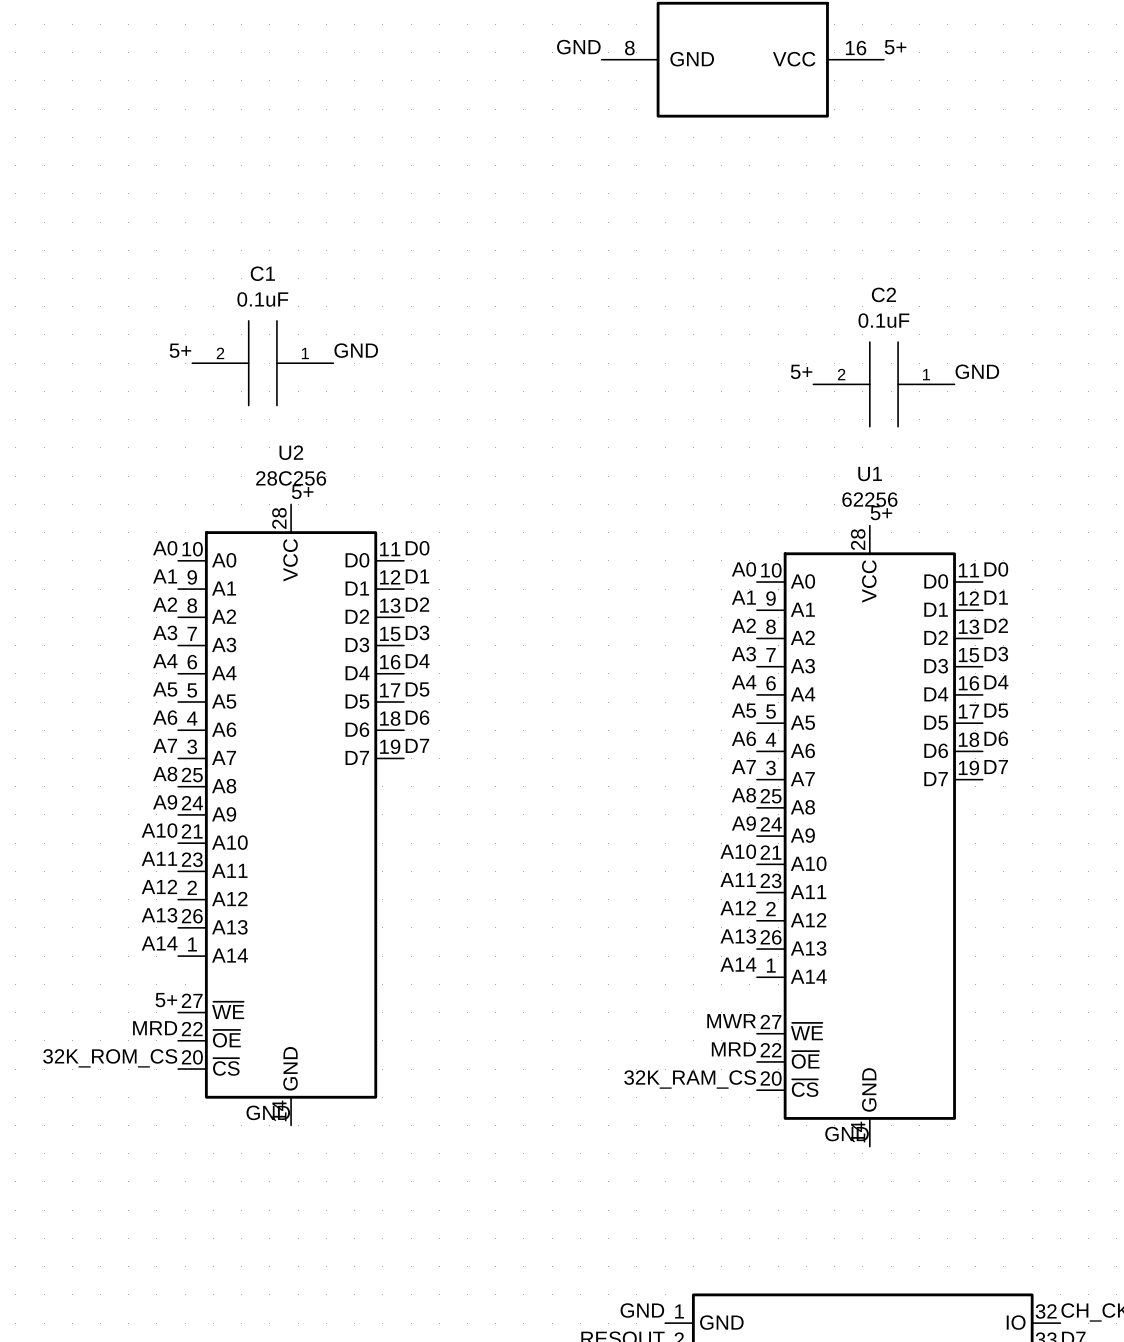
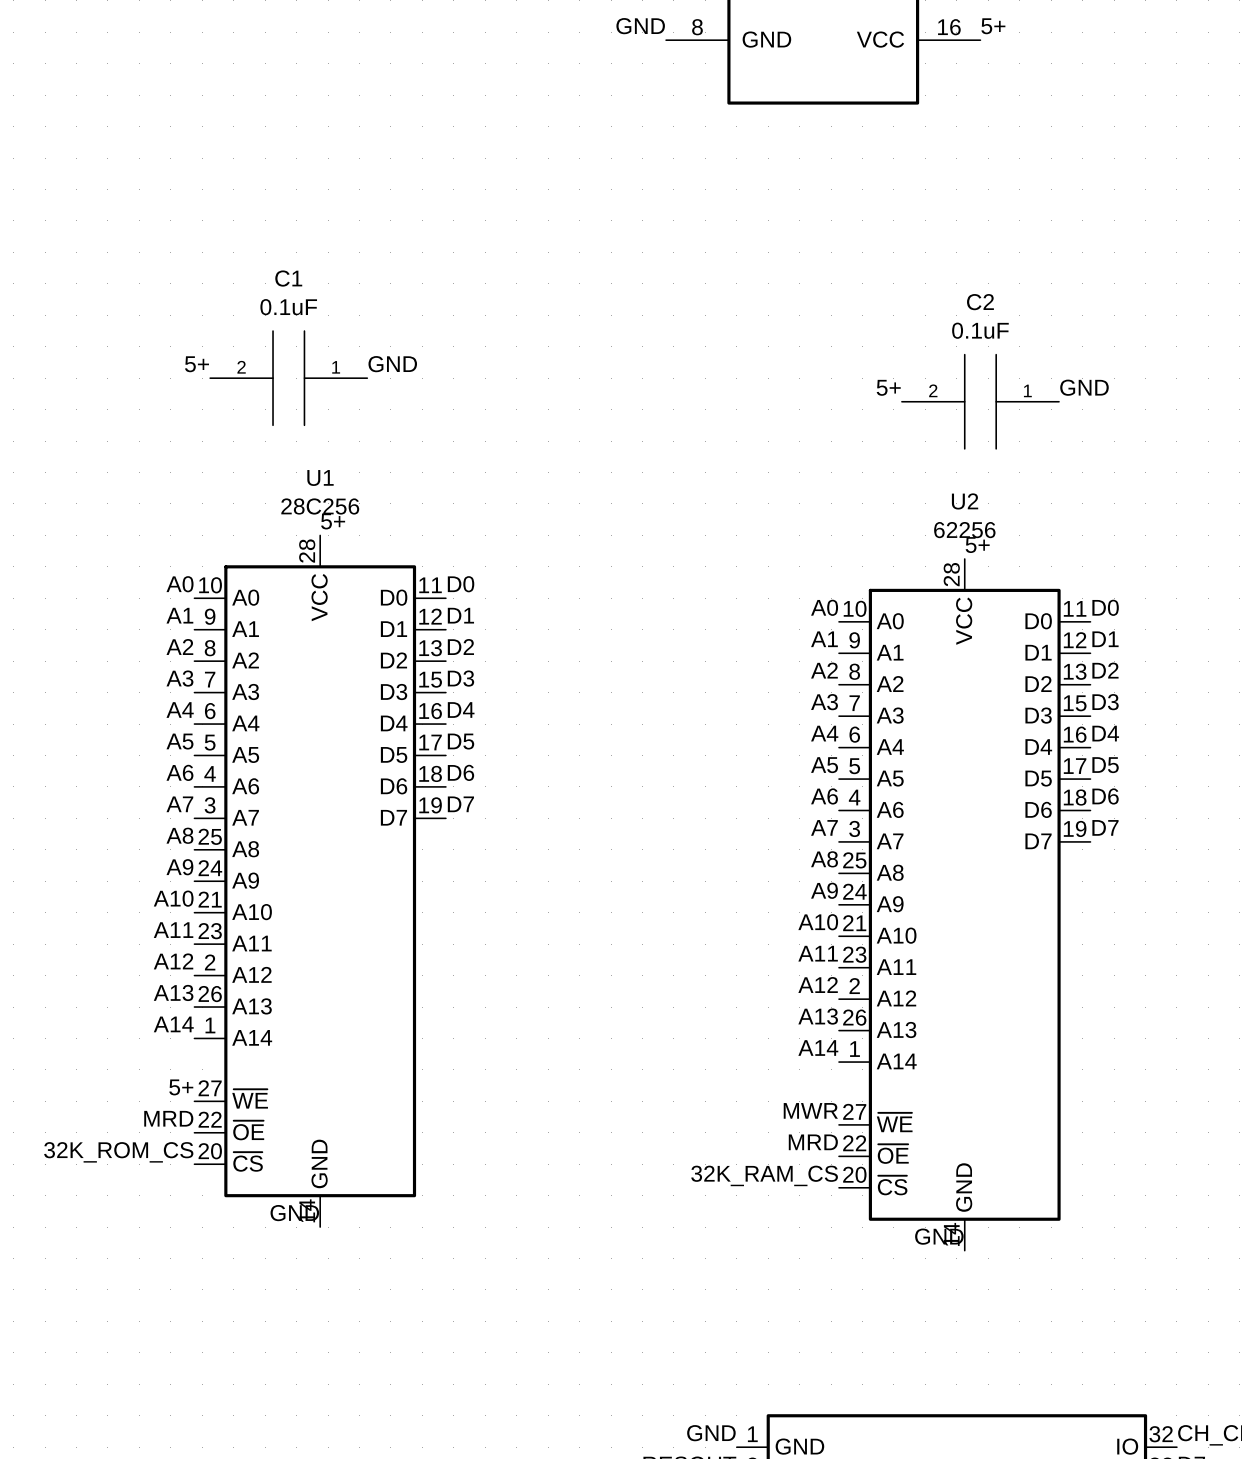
U2 name: U2 (291, 452) -> U1 (320, 478)
U1 name: U1 (870, 474) -> U2 (965, 501)

